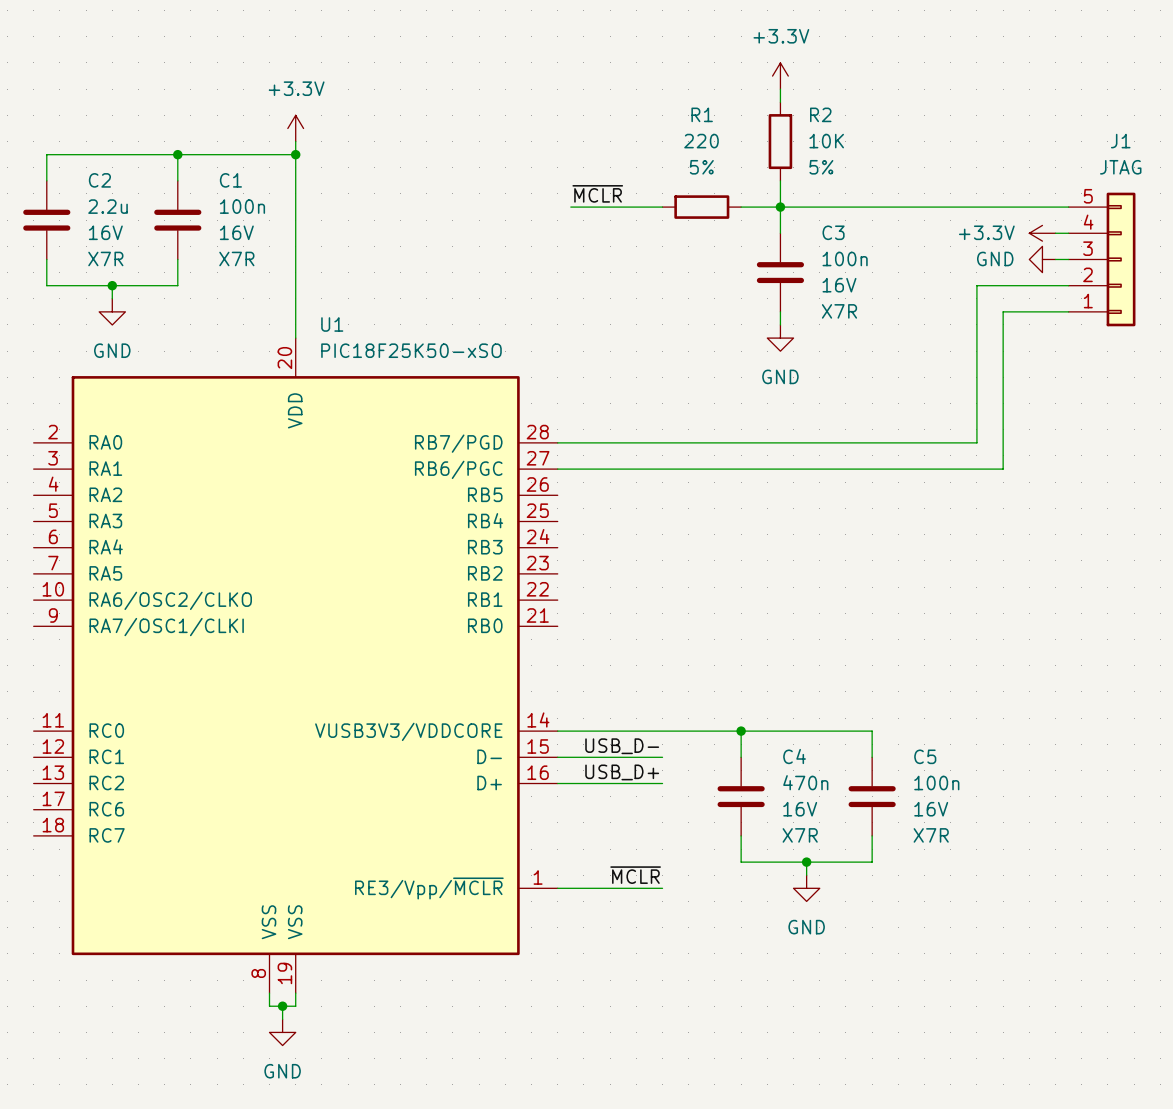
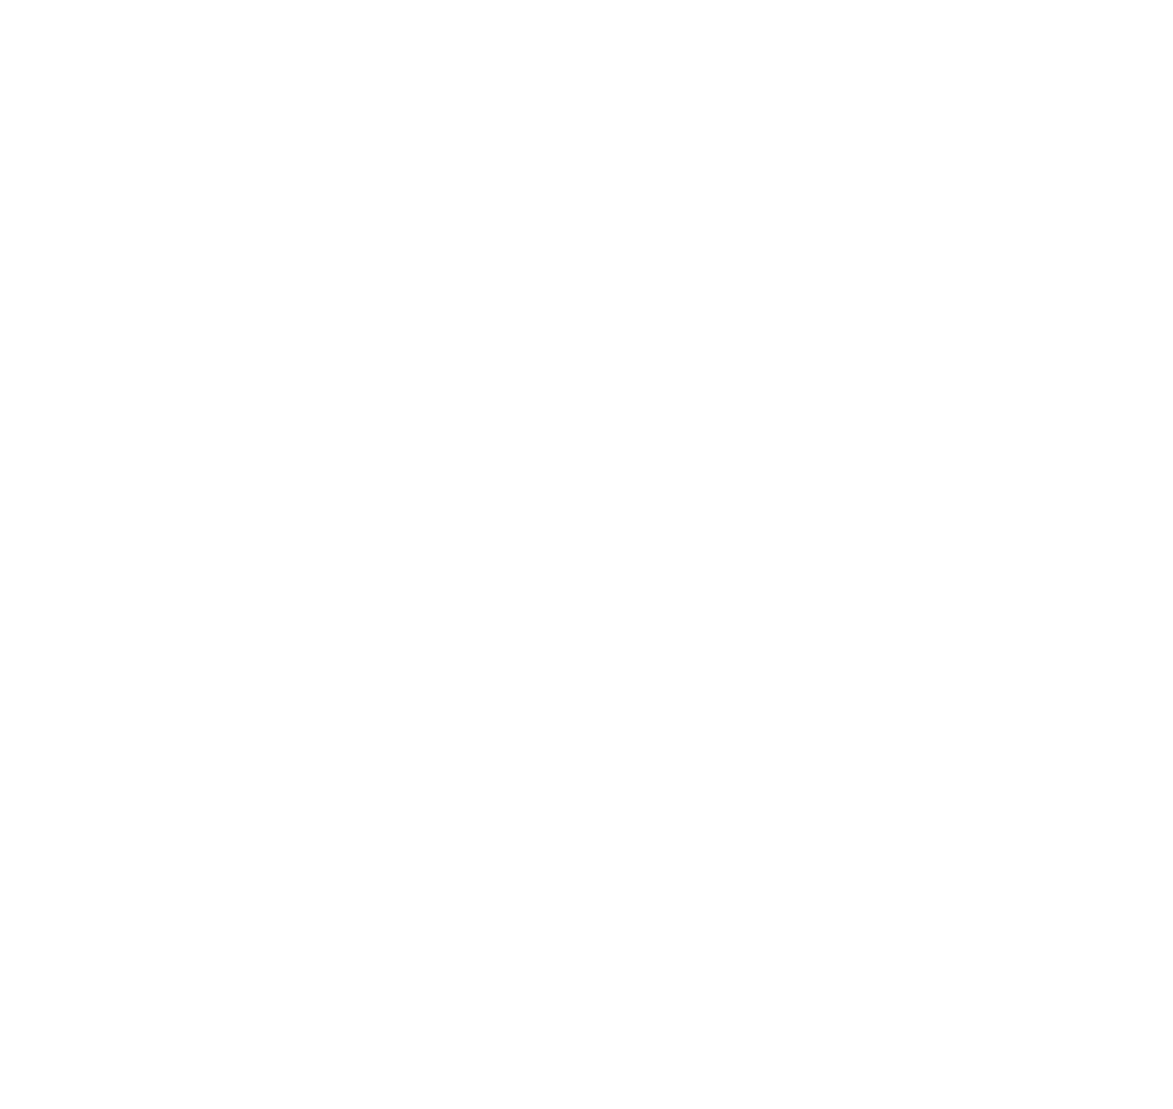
power symbol: +3.3V (780, 76) -> none
wire: (780, 89) (780, 102) -> none
power symbol: +3.3V (295, 128) -> none
wire: (295, 141) (295, 338) -> none
R2: 10K (780, 141) -> none
wire: (177, 154) (177, 180) -> none
junction: (177, 154) -> none
wire: (295, 154) (46, 154) (46, 180) -> none
junction: (295, 154) -> none
wire: (780, 180) (780, 233) -> none
label: ~{MCLR} (597, 193) -> none
wire: (570, 207) (662, 207) -> none
R1: 220 (701, 207) -> none
wire: (741, 207) (1068, 207) -> none
junction: (780, 207) -> none
C2: 2.2u (46, 220) -> none
C1: 100n (177, 220) -> none
power symbol: +3.3V (1042, 233) -> none
wire: (1055, 233) (1068, 233) -> none
wire: (46, 259) (46, 285) (177, 285) (177, 259) -> none
power symbol: GND (1042, 259) -> none
wire: (1055, 259) (1068, 259) -> none
J1: JTAG (1102, 259) -> none
C3: 100n (780, 272) -> none
wire: (112, 285) (112, 298) -> none
junction: (112, 285) -> none
wire: (1068, 285) (976, 285) (976, 442) (557, 442) -> none
power symbol: GND (112, 311) -> none
wire: (780, 311) (780, 324) -> none
wire: (1068, 311) (1003, 311) (1003, 469) (557, 469) -> none
power symbol: GND (780, 338) -> none
U1: PIC18F25K50-xSO (295, 665) -> none
wire: (557, 731) (872, 731) (872, 757) -> none
wire: (741, 731) (741, 757) -> none
junction: (741, 731) -> none
label: USB_D- (622, 746) -> none
wire: (557, 757) (662, 757) -> none
label: USB_D+ (622, 772) -> none
wire: (557, 783) (662, 783) -> none
C4: 470n (741, 796) -> none
C5: 100n (872, 796) -> none
wire: (741, 835) (741, 862) (872, 862) (872, 835) -> none
wire: (806, 862) (806, 875) -> none
junction: (806, 862) -> none
label: ~{MCLR} (635, 875) -> none
wire: (557, 888) (662, 888) -> none
power symbol: GND (806, 888) -> none
wire: (269, 993) (269, 1006) (295, 1006) (295, 993) -> none
wire: (282, 1006) (282, 1019) -> none
junction: (282, 1006) -> none
power symbol: GND (282, 1032) -> none

